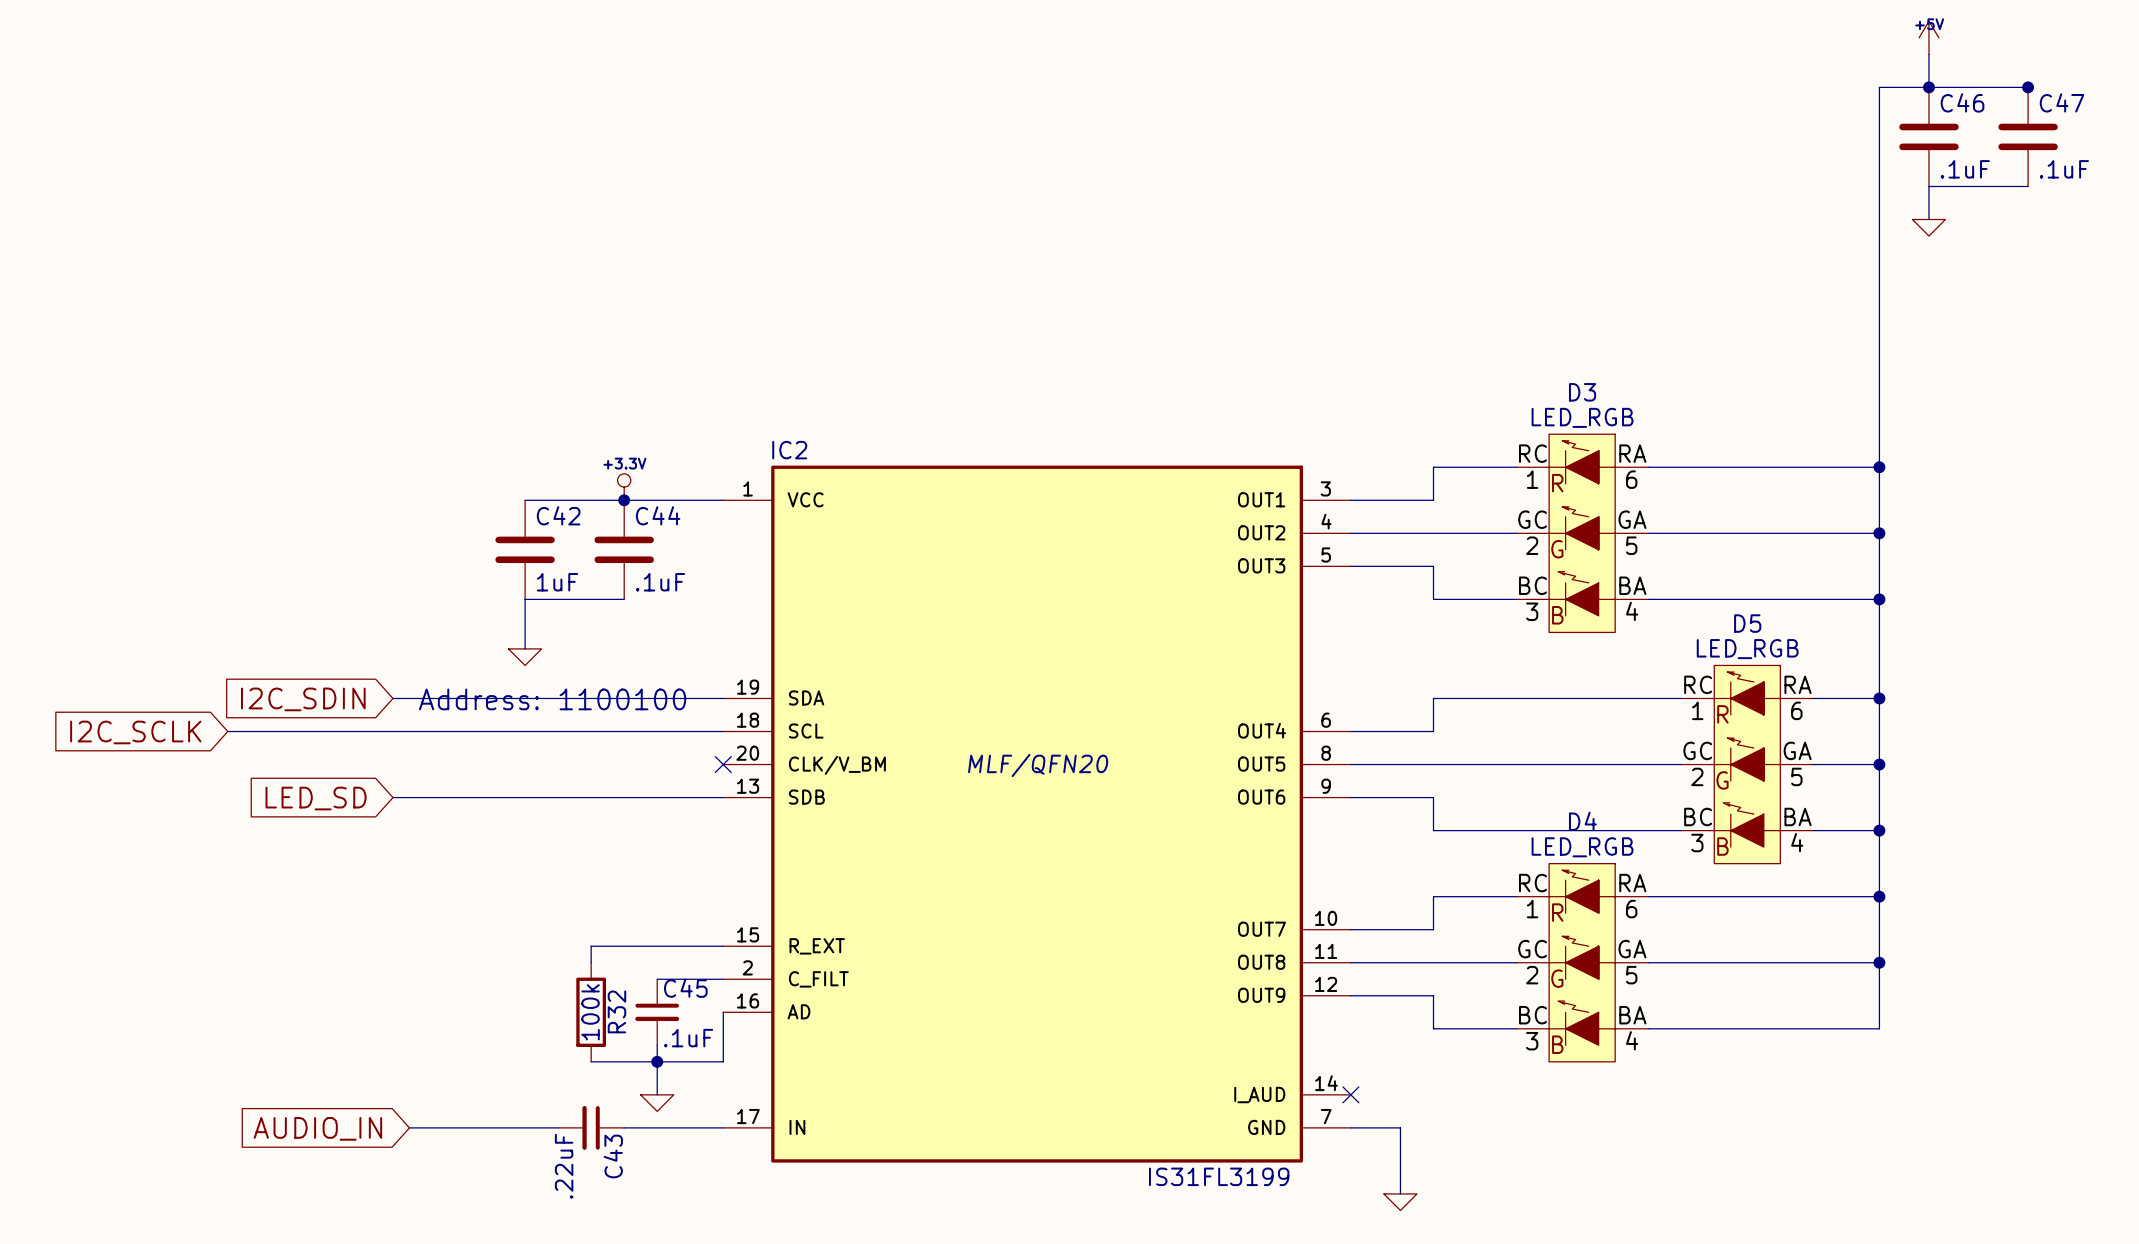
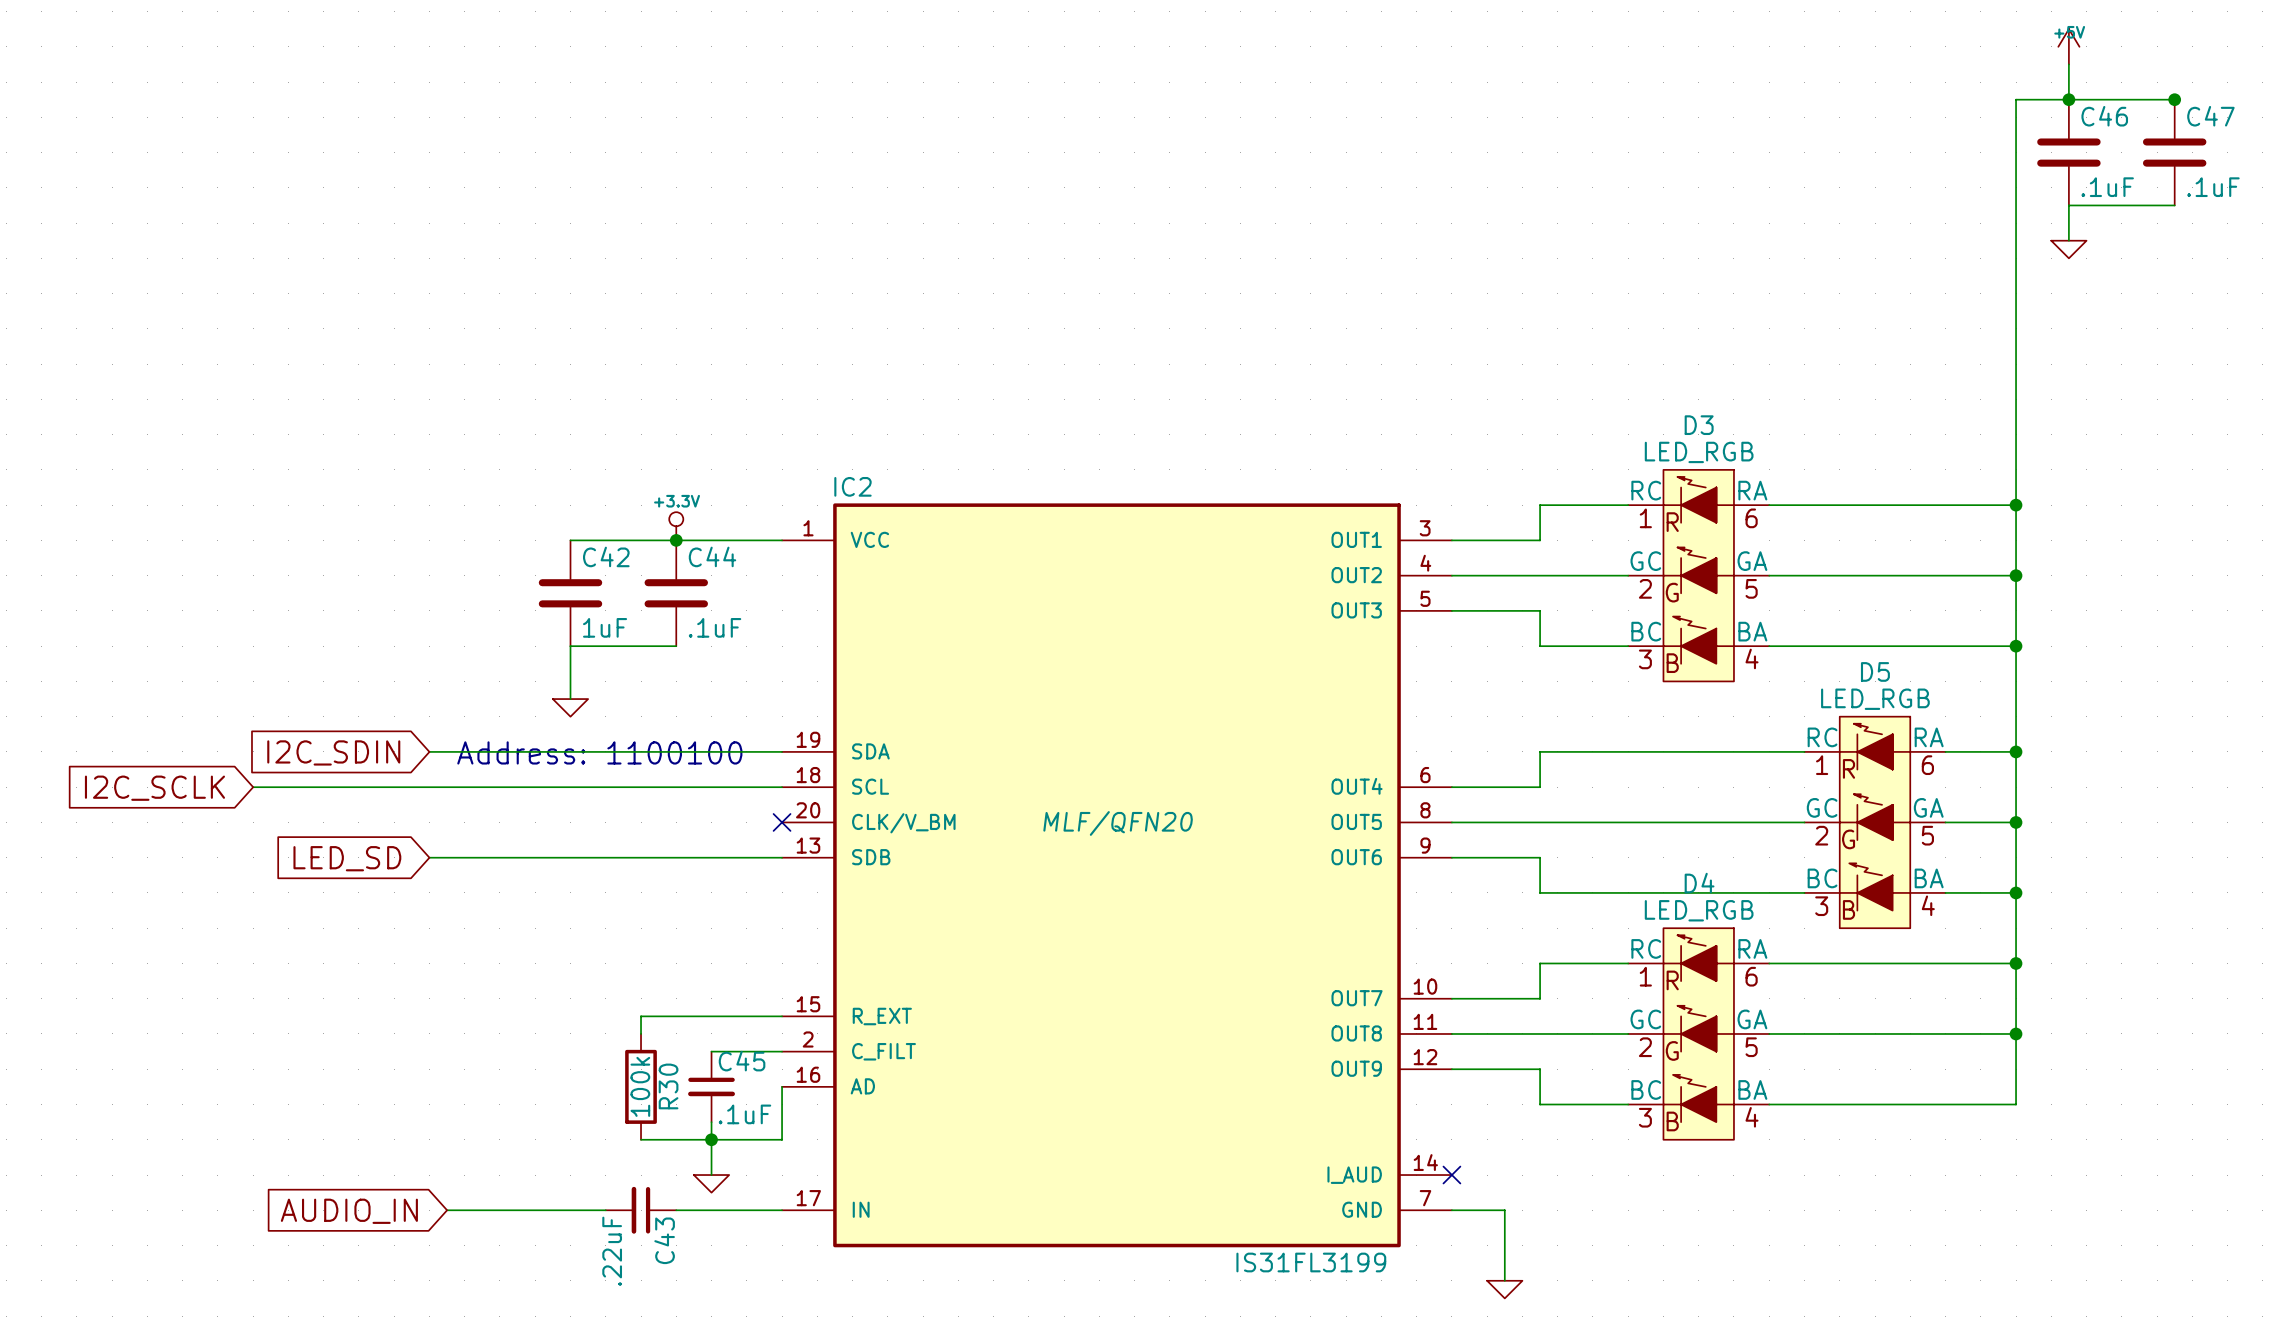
R32 name: R32 (616, 1011) -> R30 (668, 1086)

